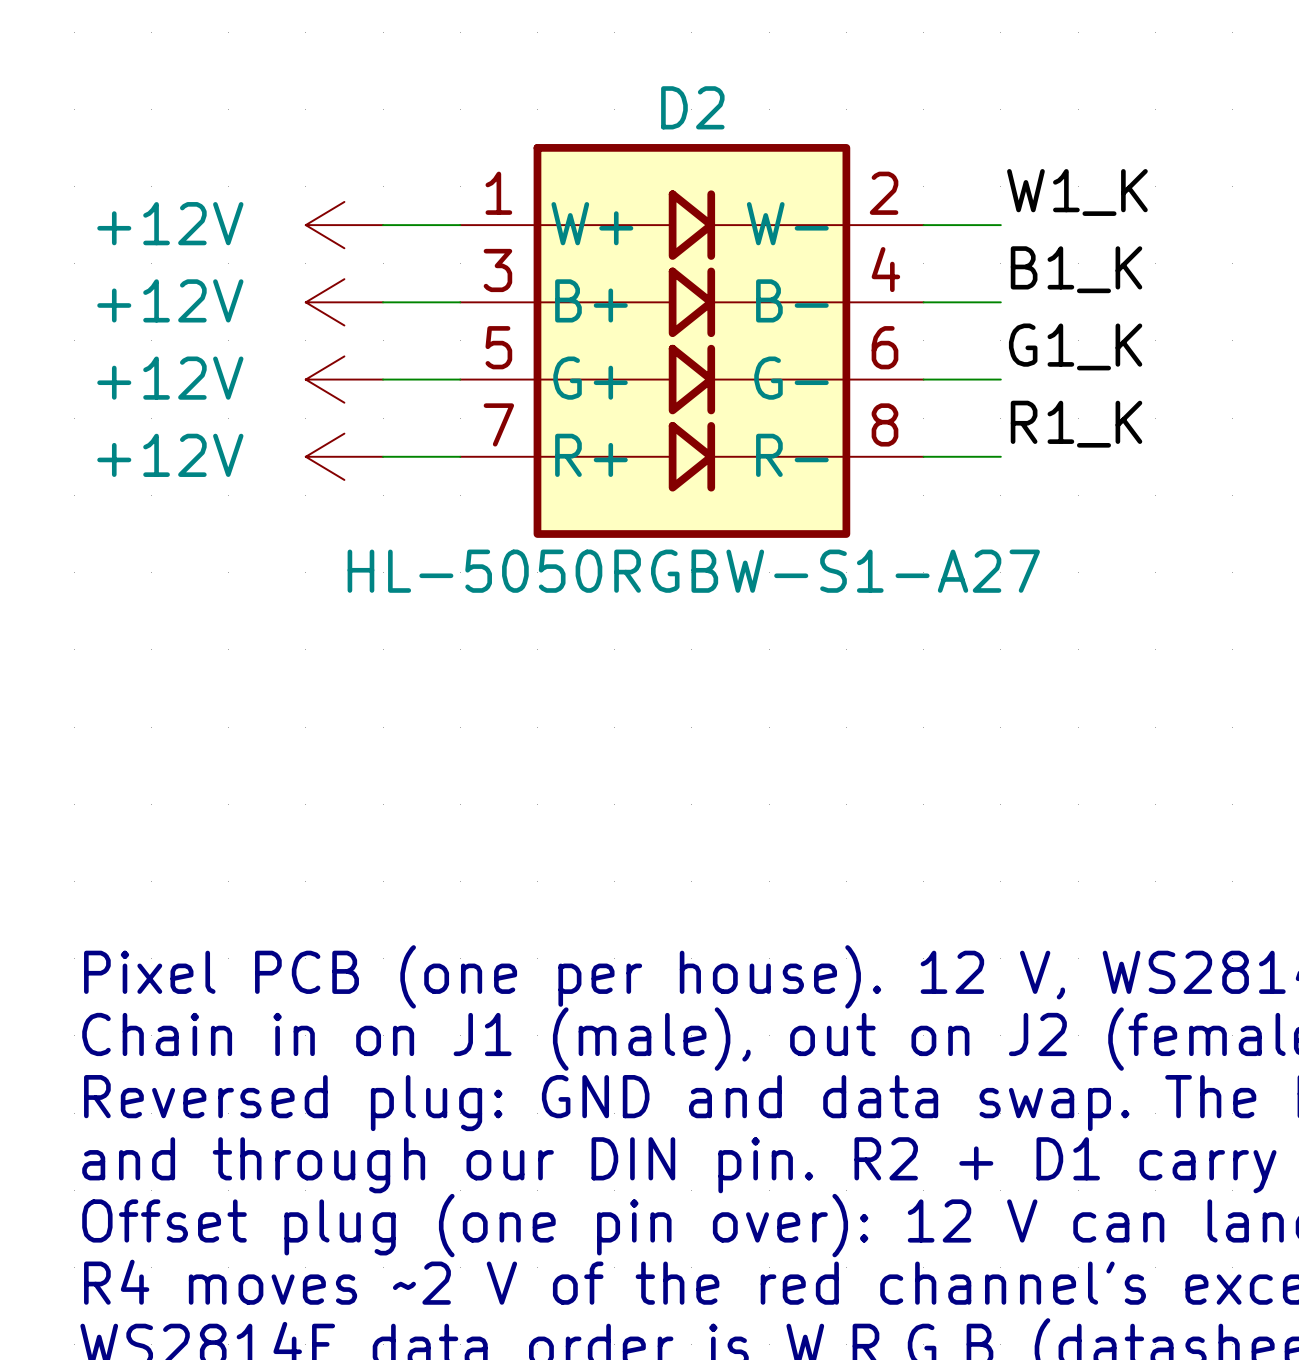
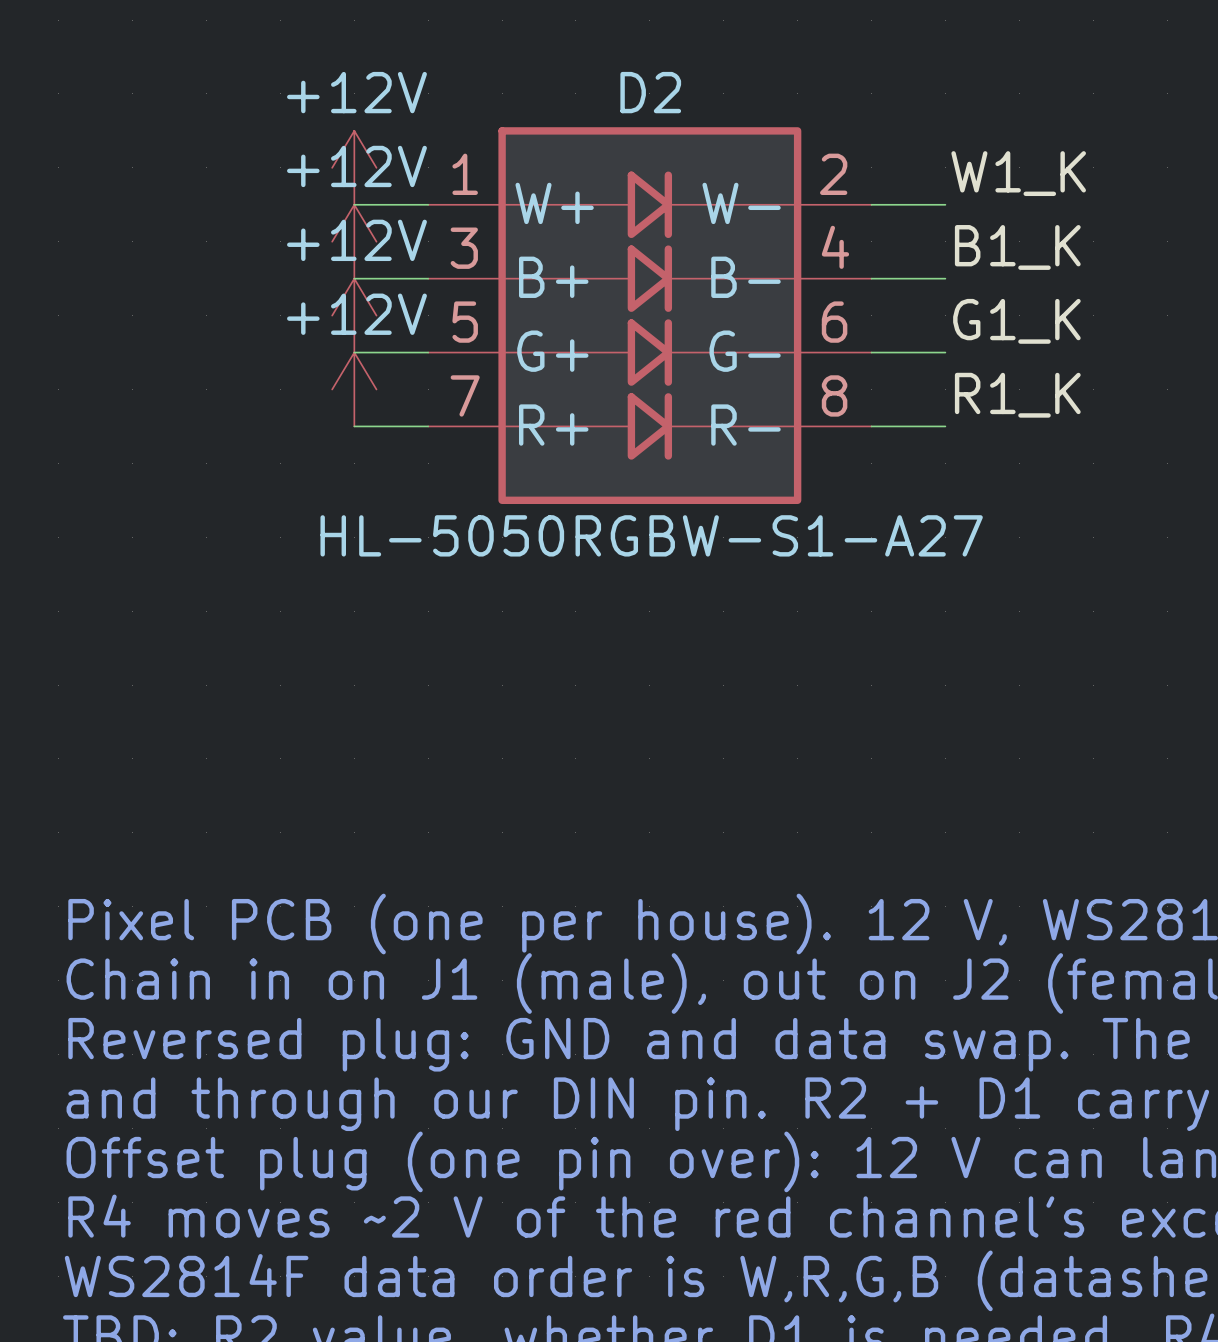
power symbol: none -> +12V (354, 167)
power symbol: +12V (344, 225) -> none
power symbol: none -> +12V (354, 241)
power symbol: +12V (344, 302) -> none
power symbol: none -> +12V (354, 315)
power symbol: +12V (344, 379) -> none
power symbol: none -> +12V (354, 389)
power symbol: +12V (344, 456) -> none

